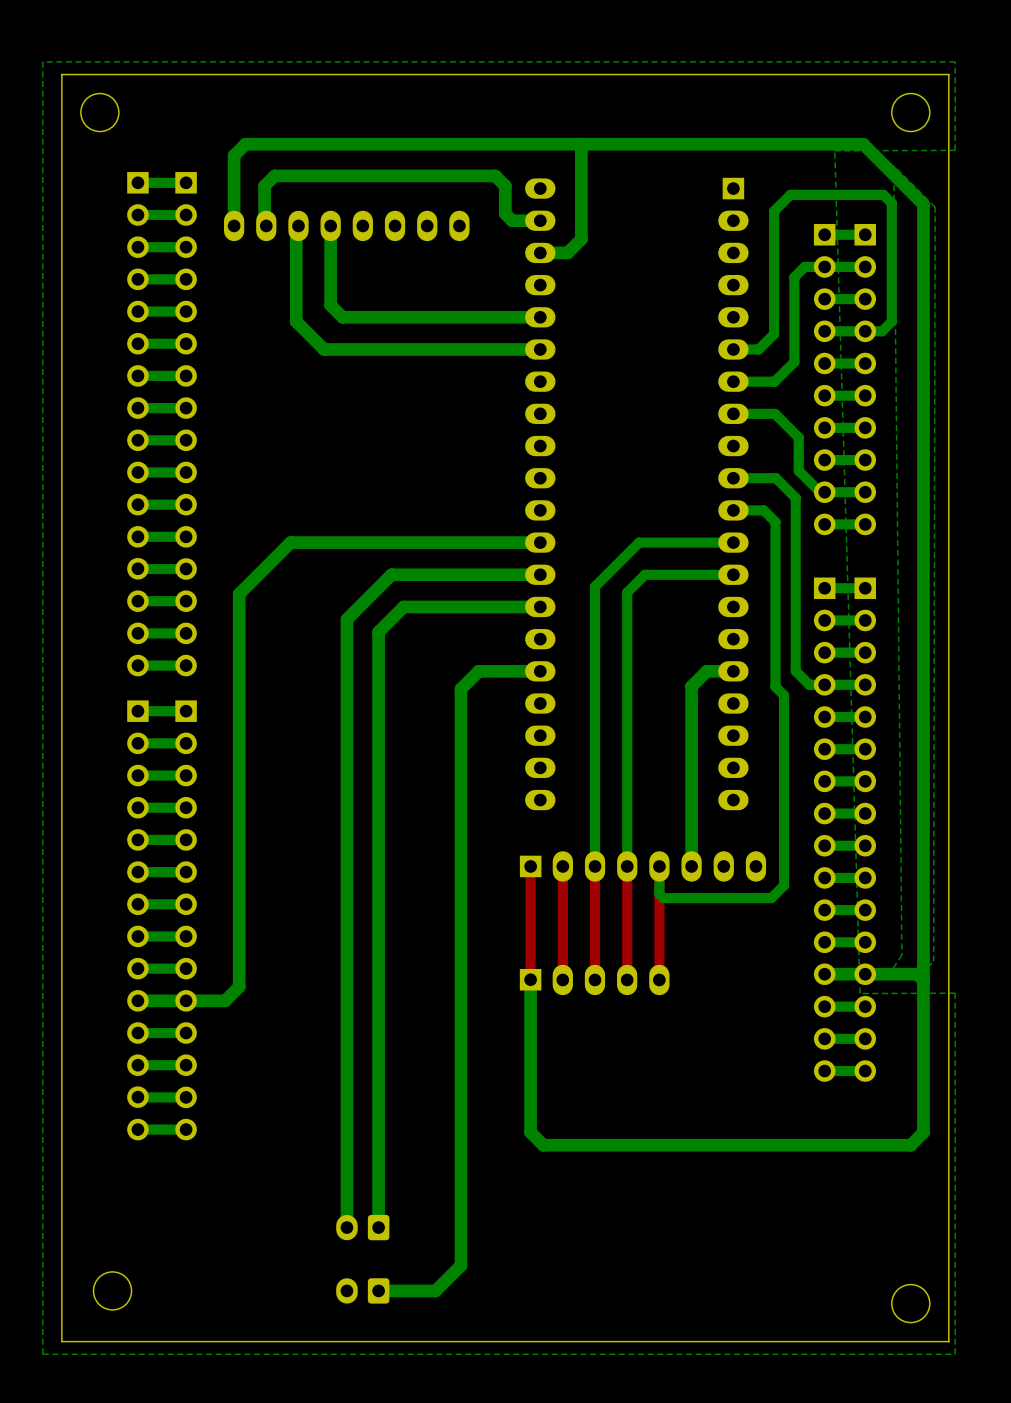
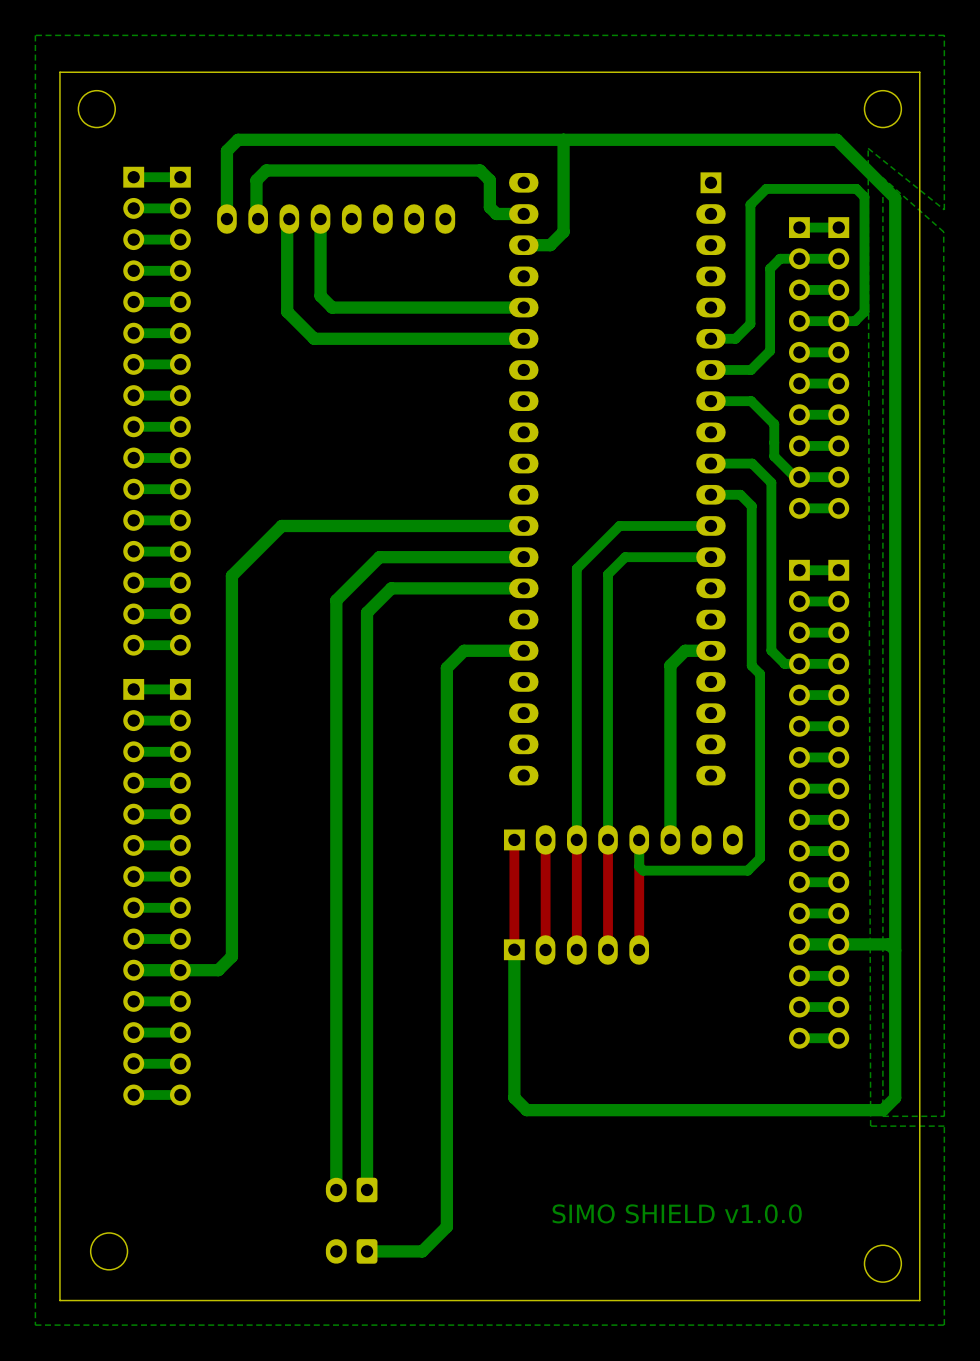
bottom zone outline: (955, 61) (955, 150) (834, 150) (860, 993) (955, 993) (955, 1354) (42, 1354) (42, 61) (955, 61) -> (944, 35) (944, 209) (868, 148) (870, 1126) (944, 1126) (944, 1325) (35, 1325) (35, 35) (944, 35)
bottom zone outline: (893, 165) (935, 207) (933, 961) (920, 974) (889, 974) (901, 955) (893, 165) -> none
bottom zone outline: none -> (882, 177) (943, 231) (944, 1116) (882, 1116) (882, 177)
text: none -> SIMO SHIELD v1.0.0 (677, 1213)

